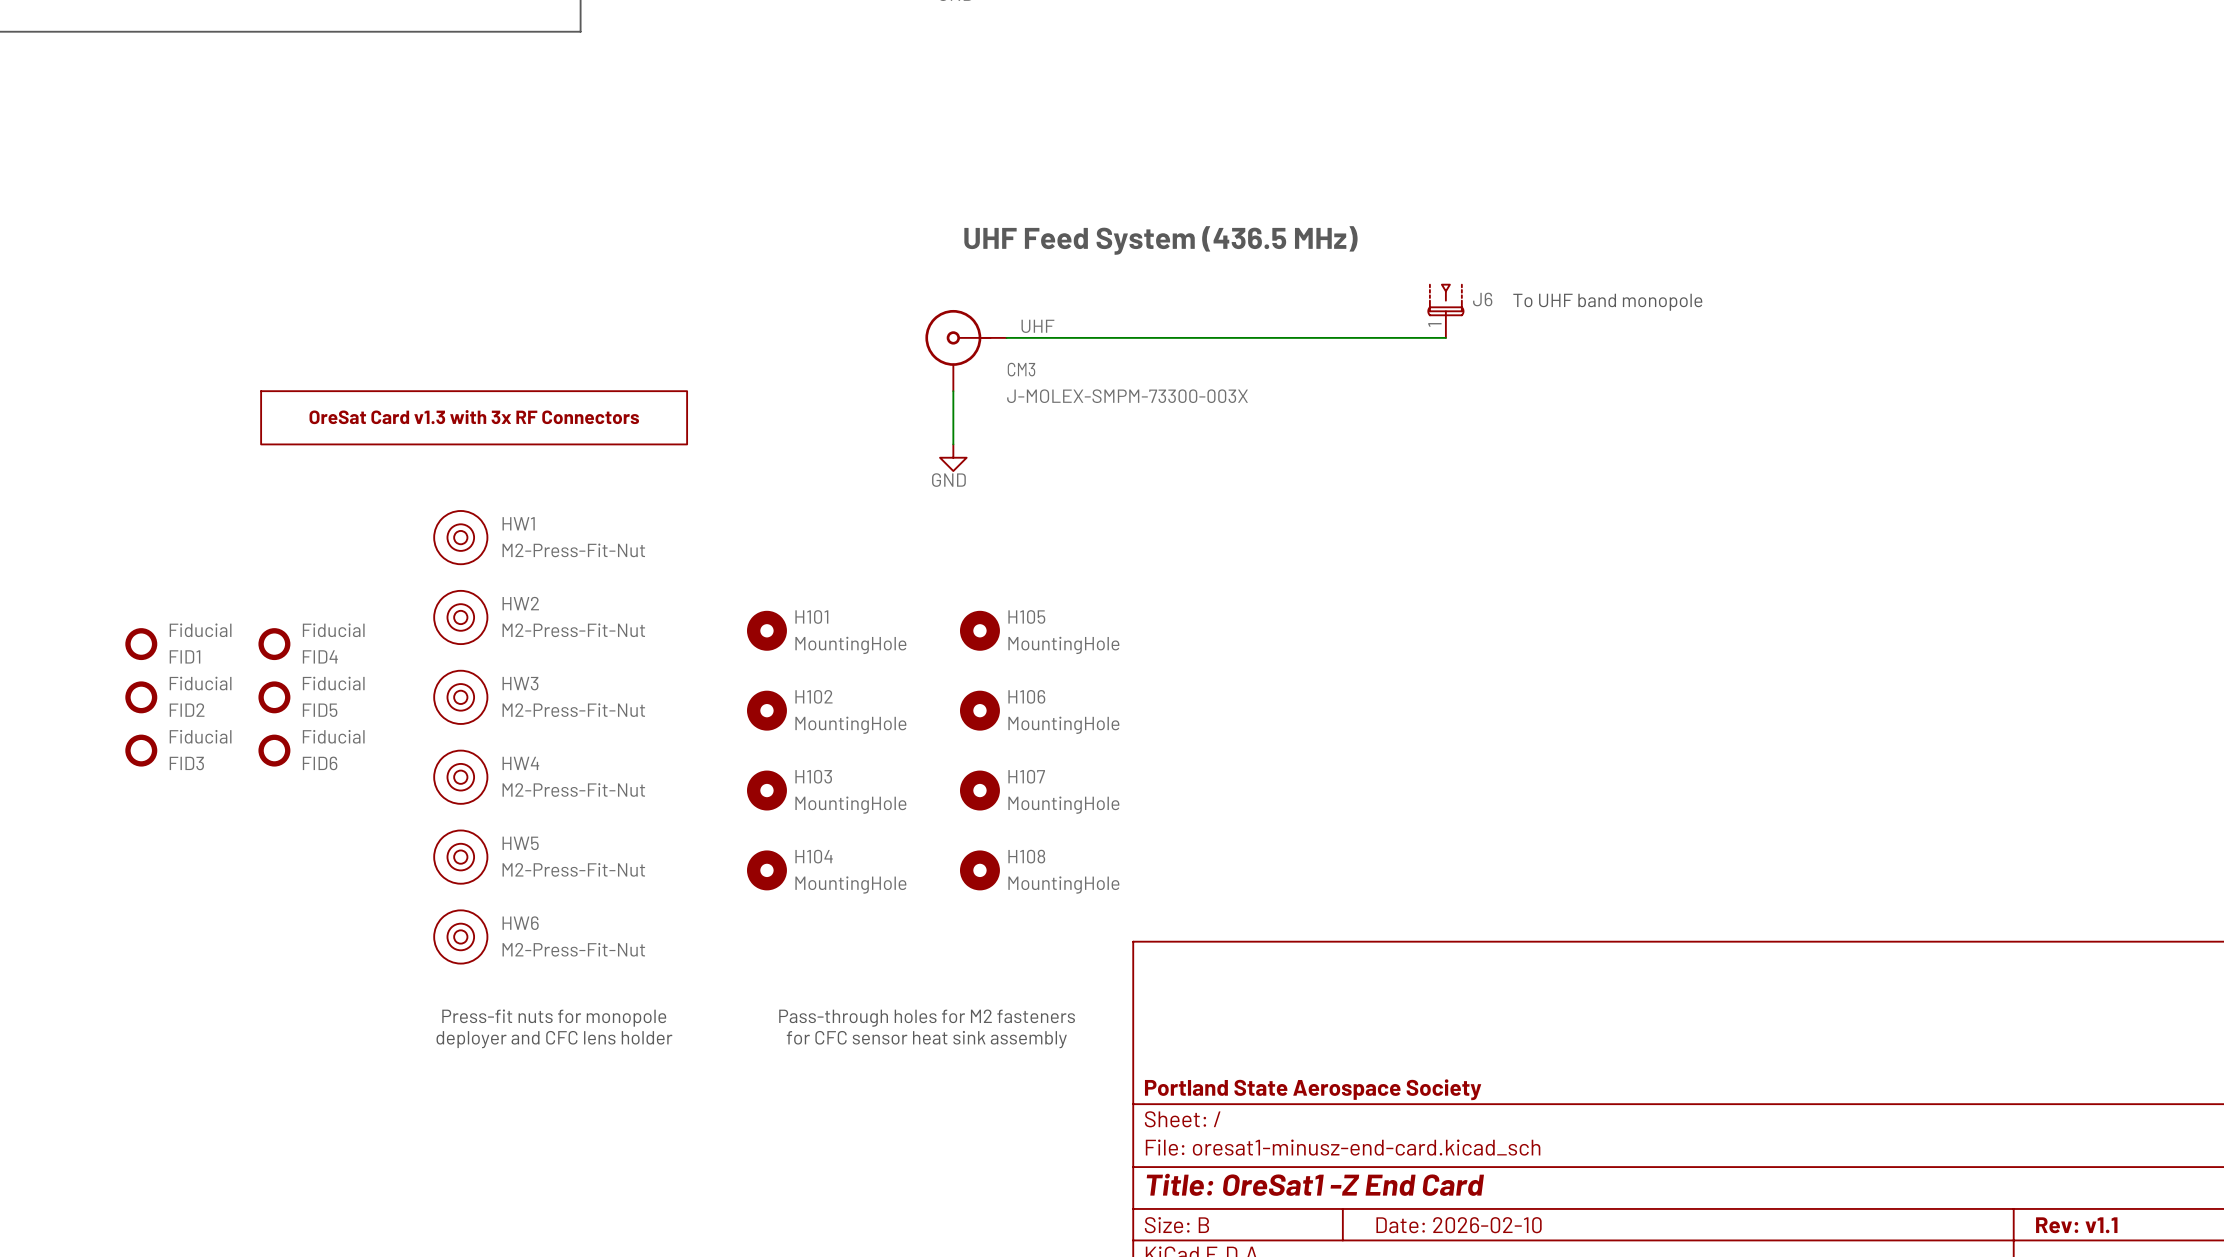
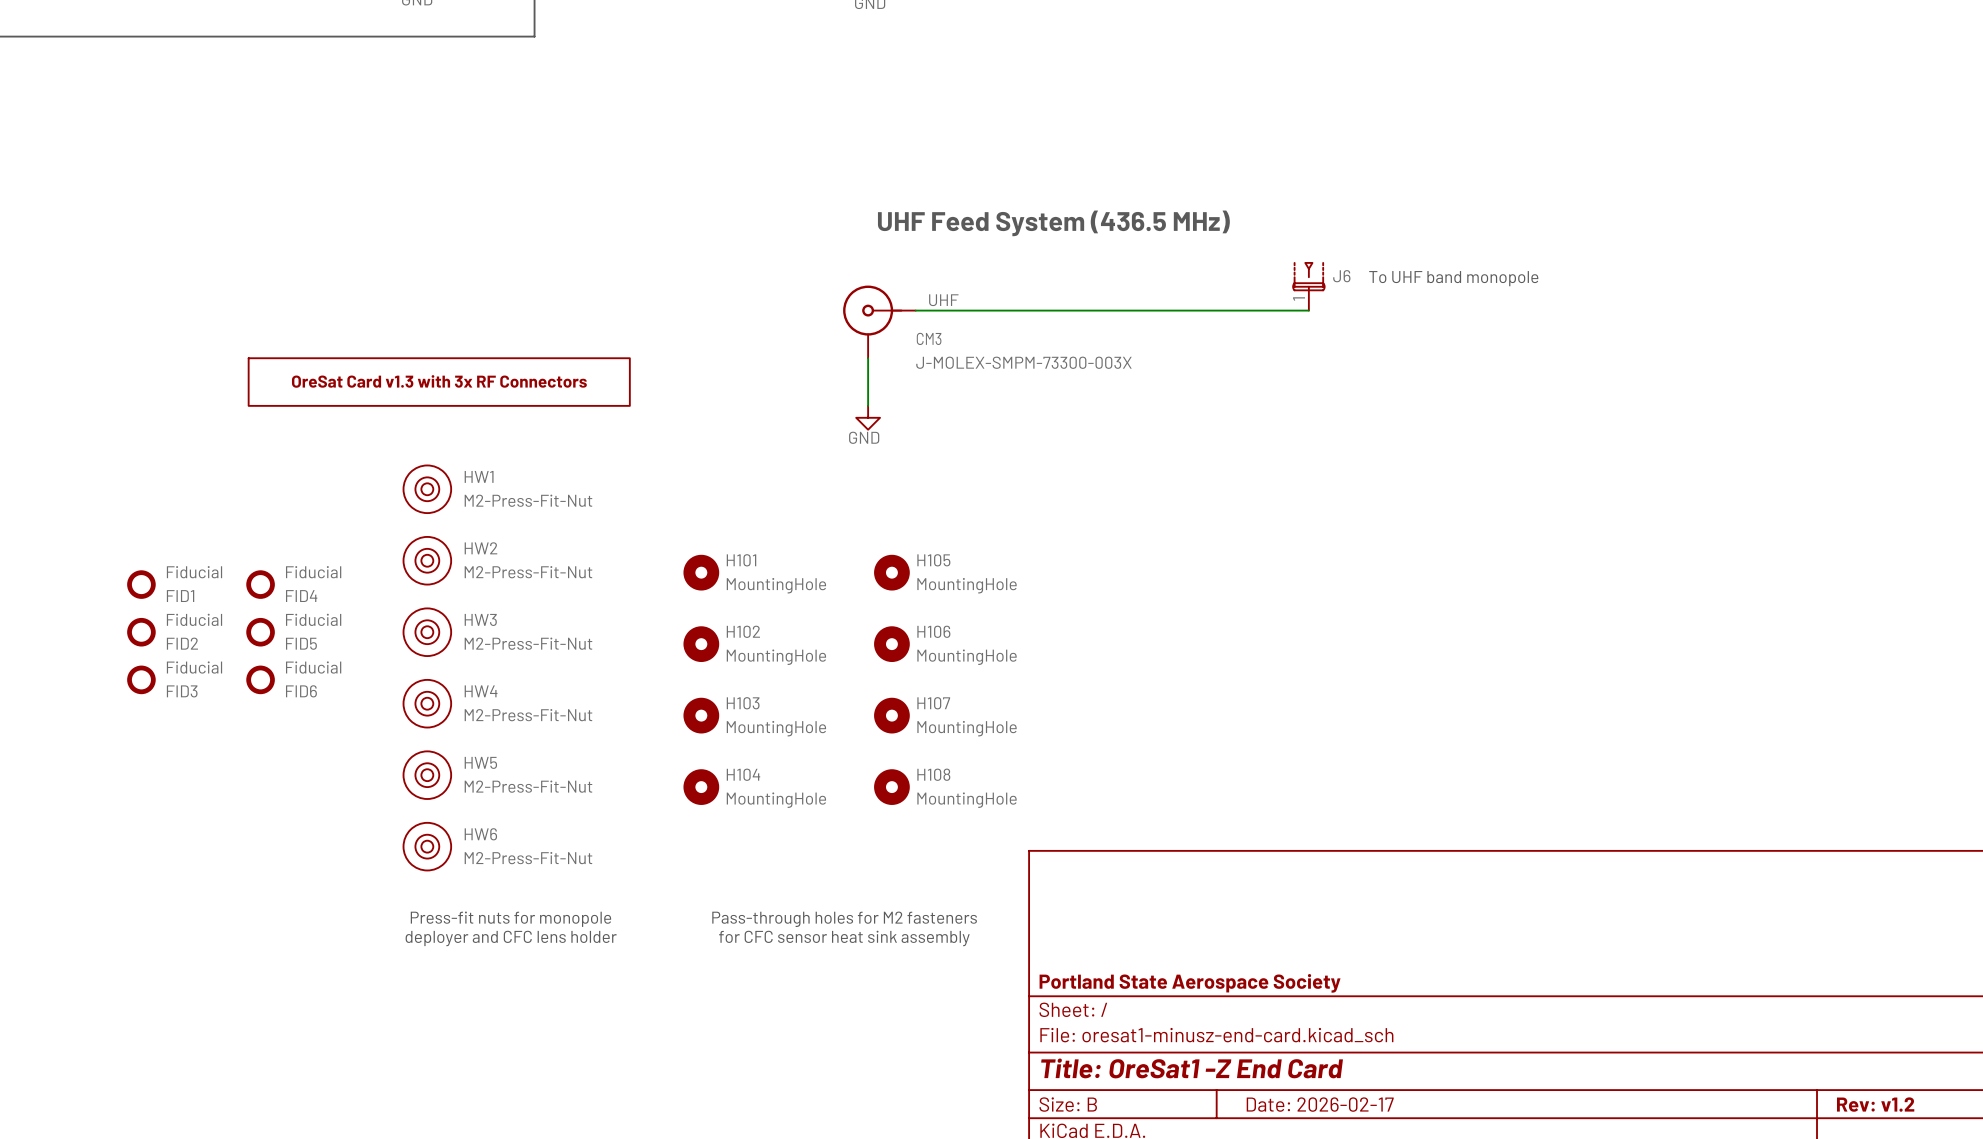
title block: Date: 2026-02-10 (1459, 1225) -> Date: 2026-02-17 (1320, 1104)
title block: Rev: v1.1 (2076, 1225) -> Rev: v1.2 (1875, 1104)

